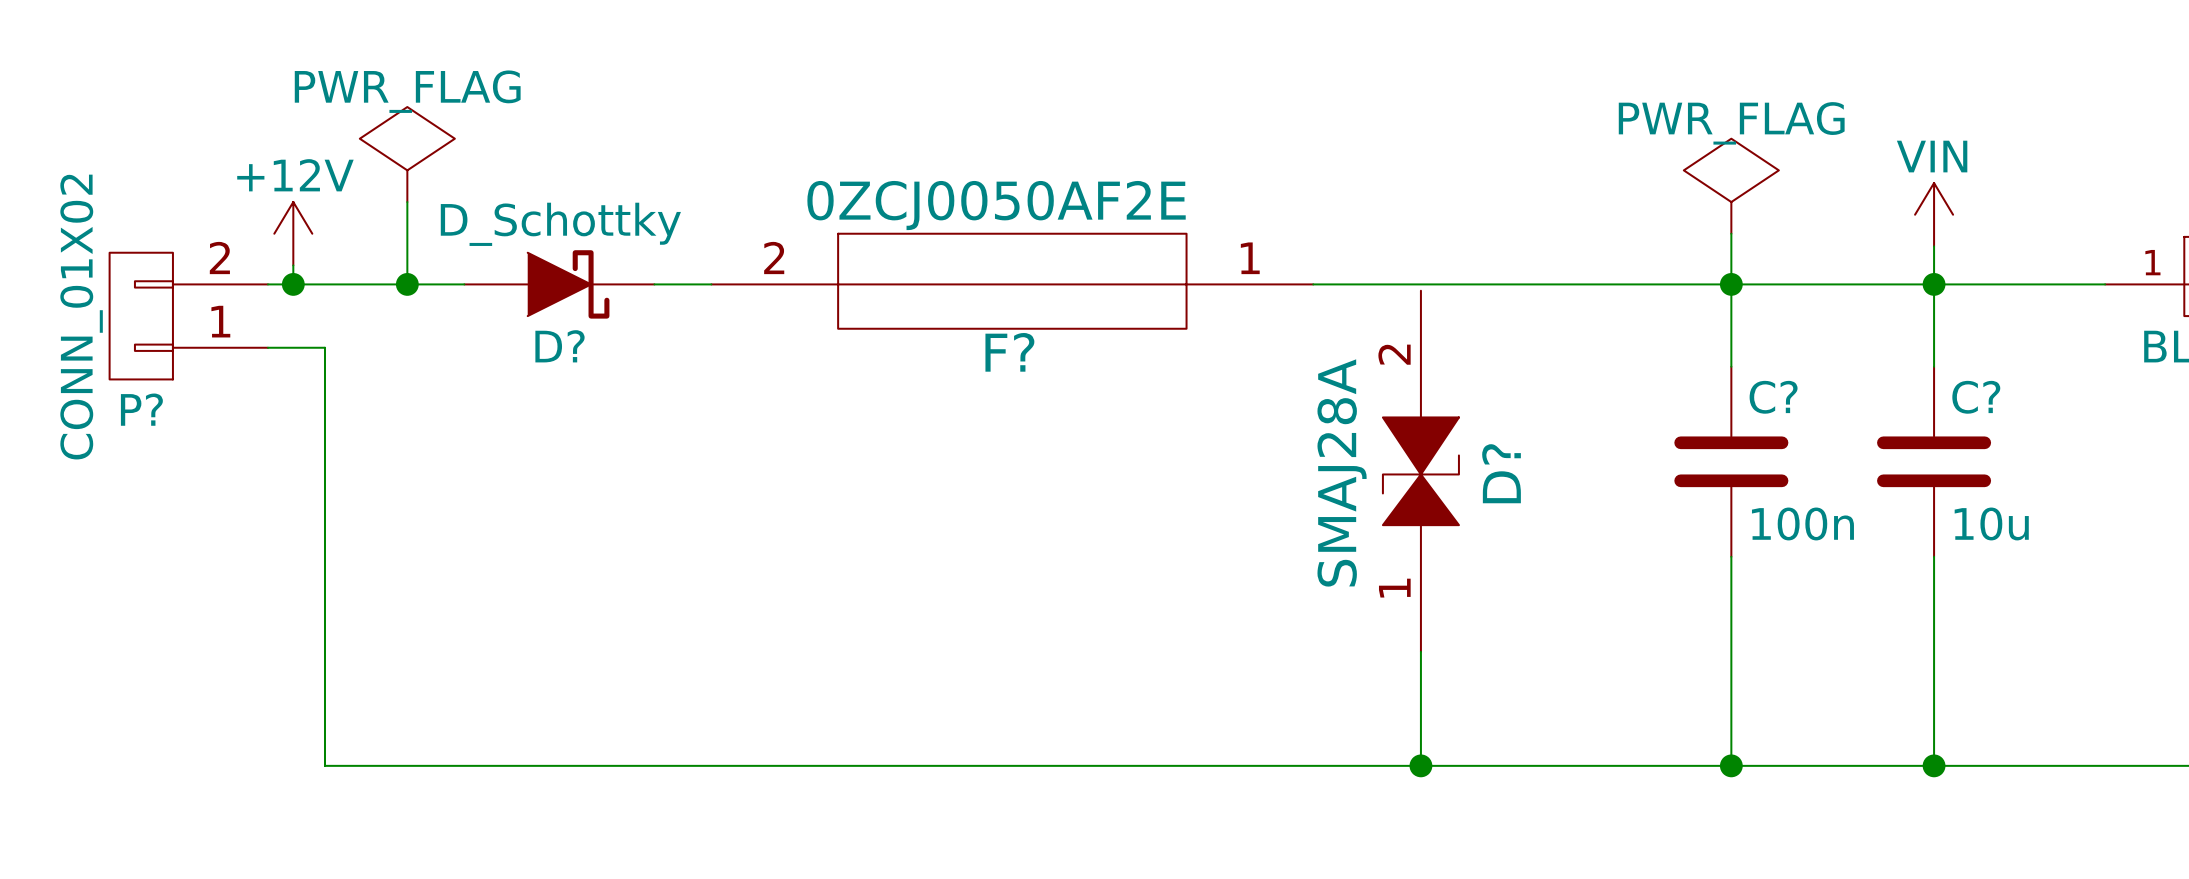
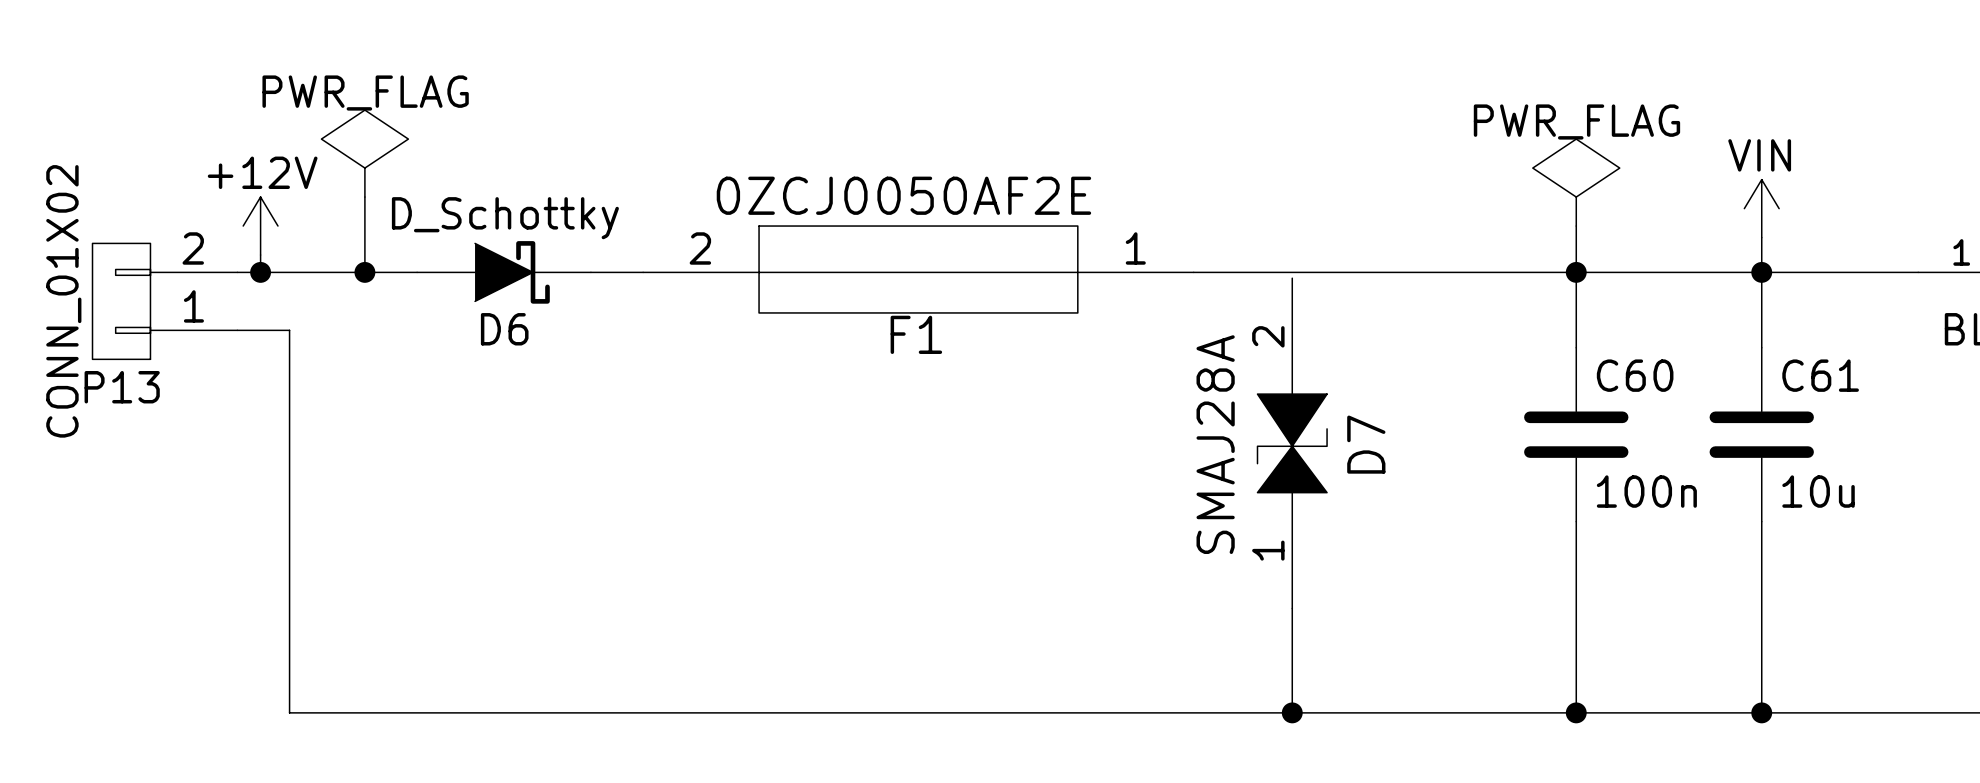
D? name: D? (560, 346) -> D6 (504, 329)
F? name: F? (1009, 352) -> F1 (916, 334)
C? name: C? (1773, 397) -> C60 (1635, 375)
C? name: C? (1976, 397) -> C61 (1820, 375)
P? name: P? (141, 409) -> P13 (122, 387)
D? name: D? (1501, 473) -> D7 (1366, 444)

